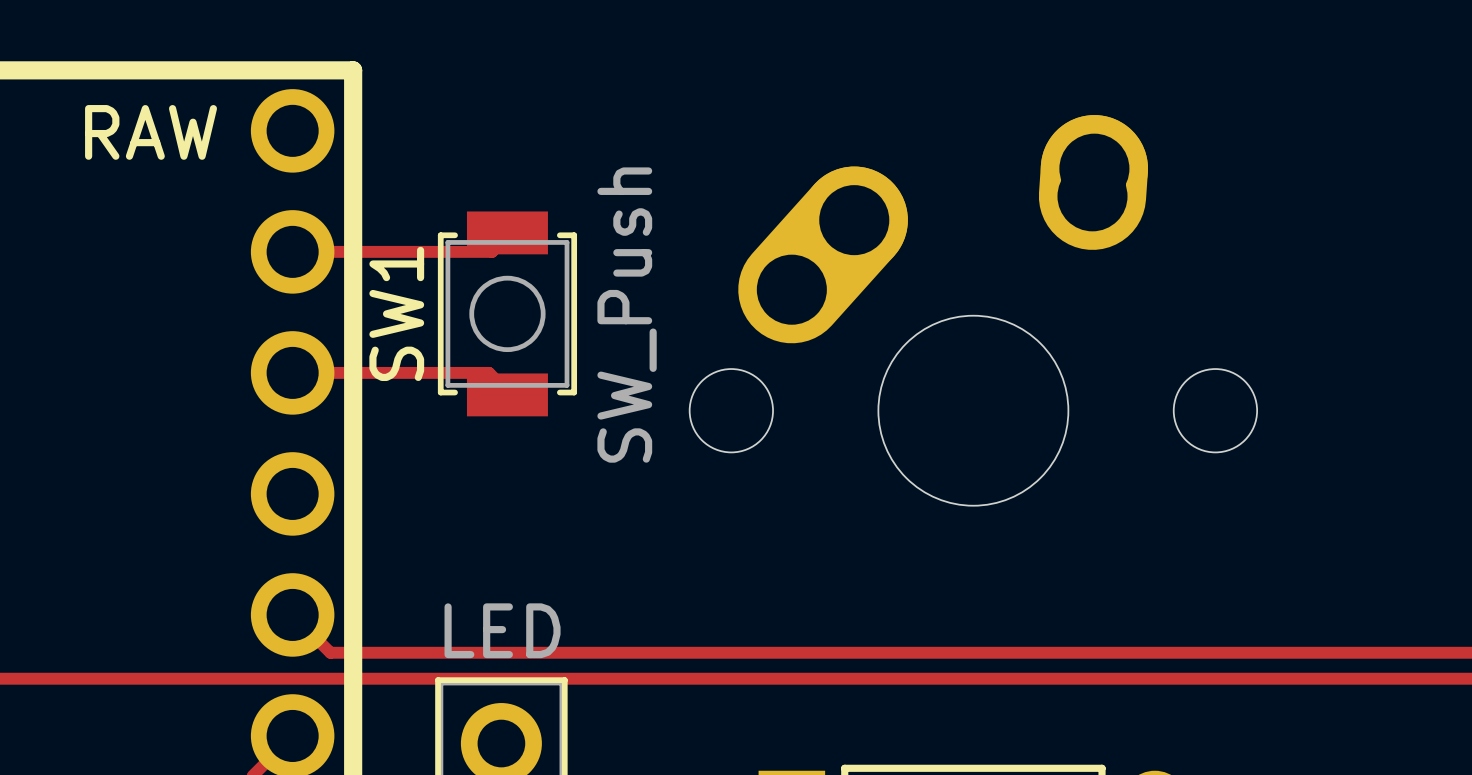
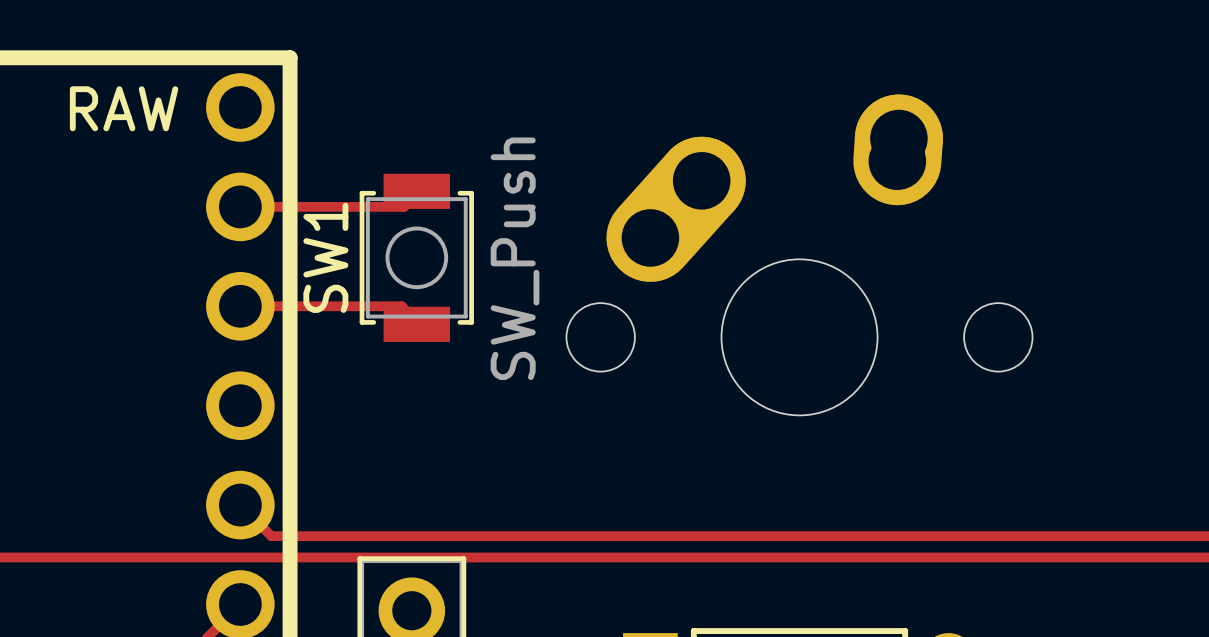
part value: LED (502, 630) -> none

